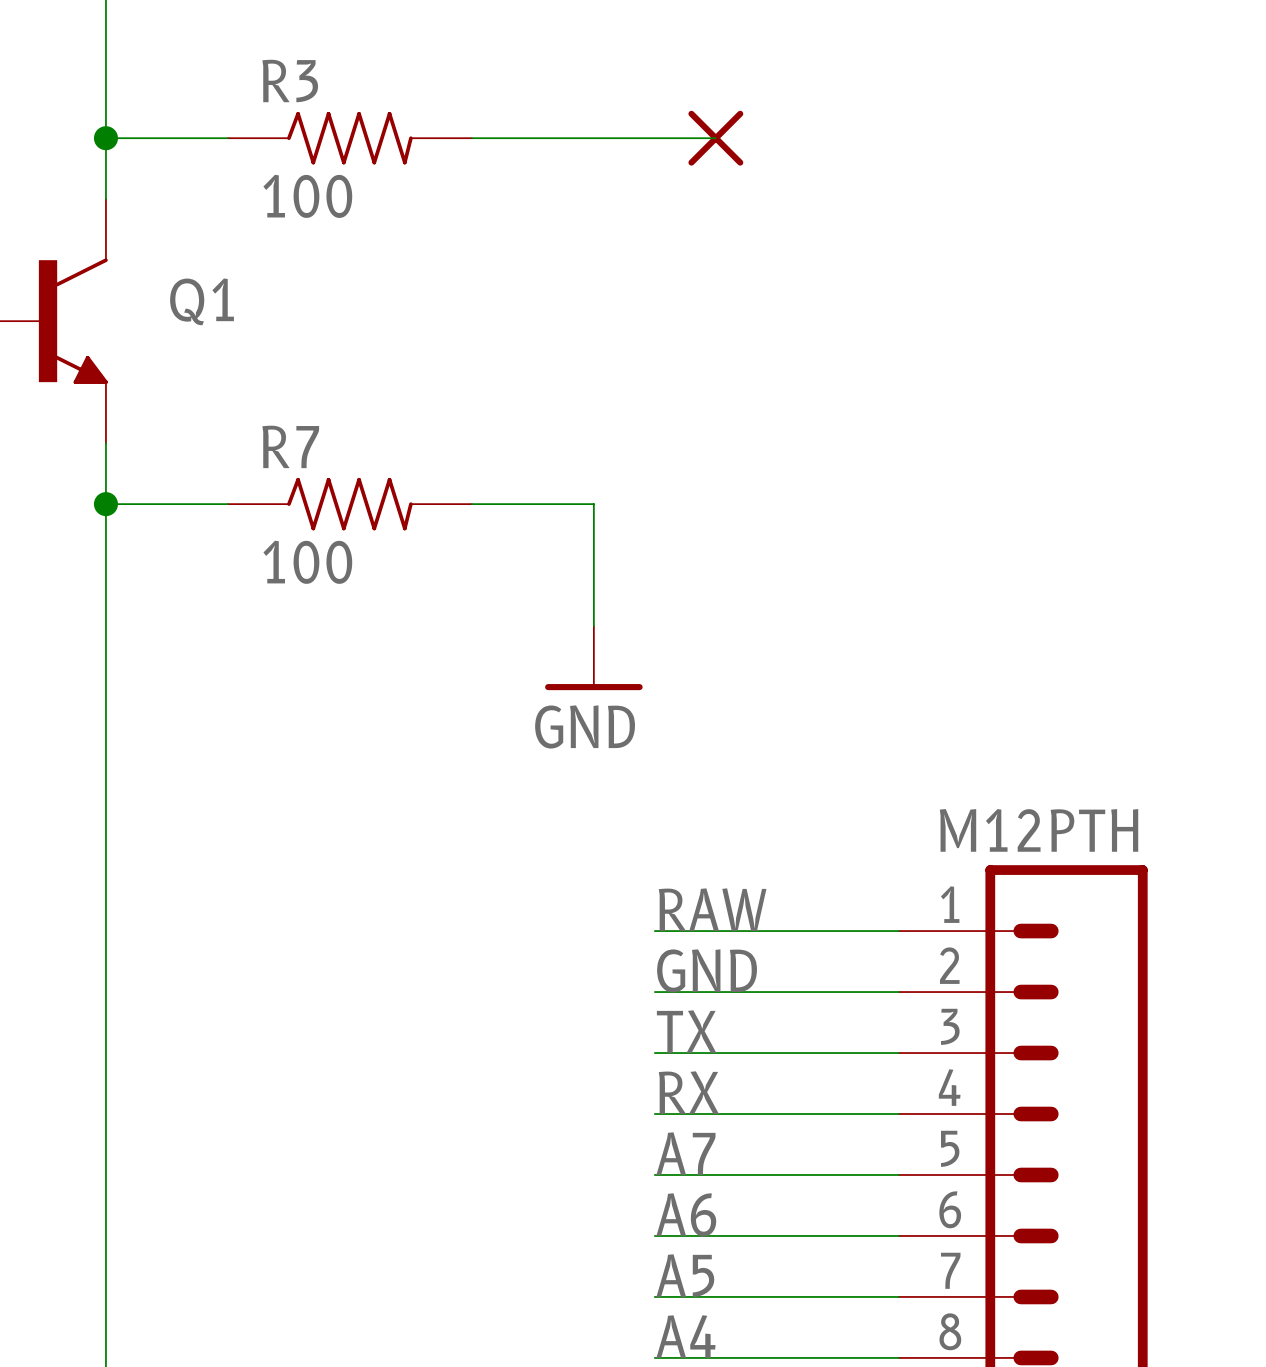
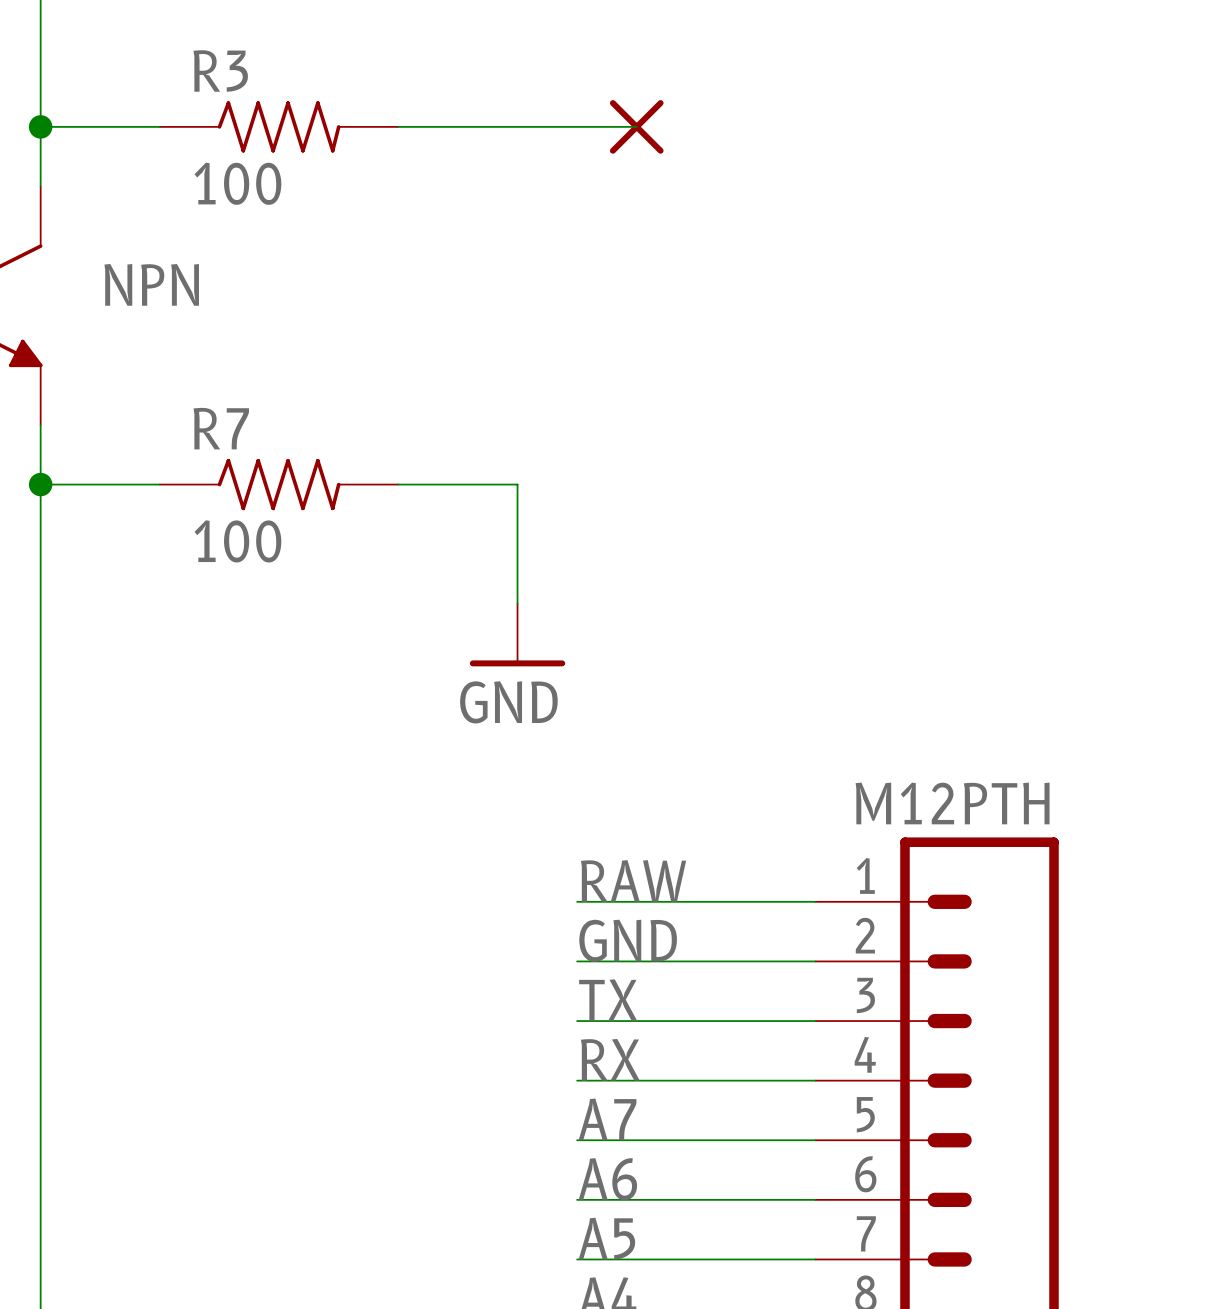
Q1 name: Q1 (202, 301) -> NPN (151, 284)

